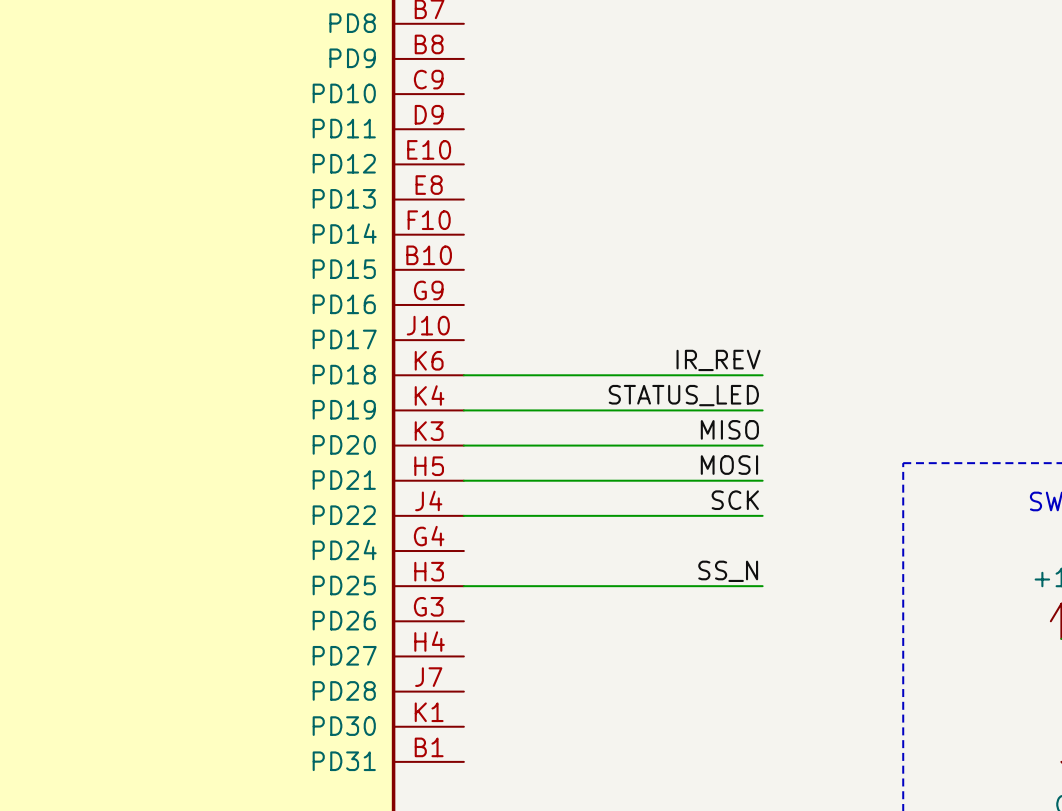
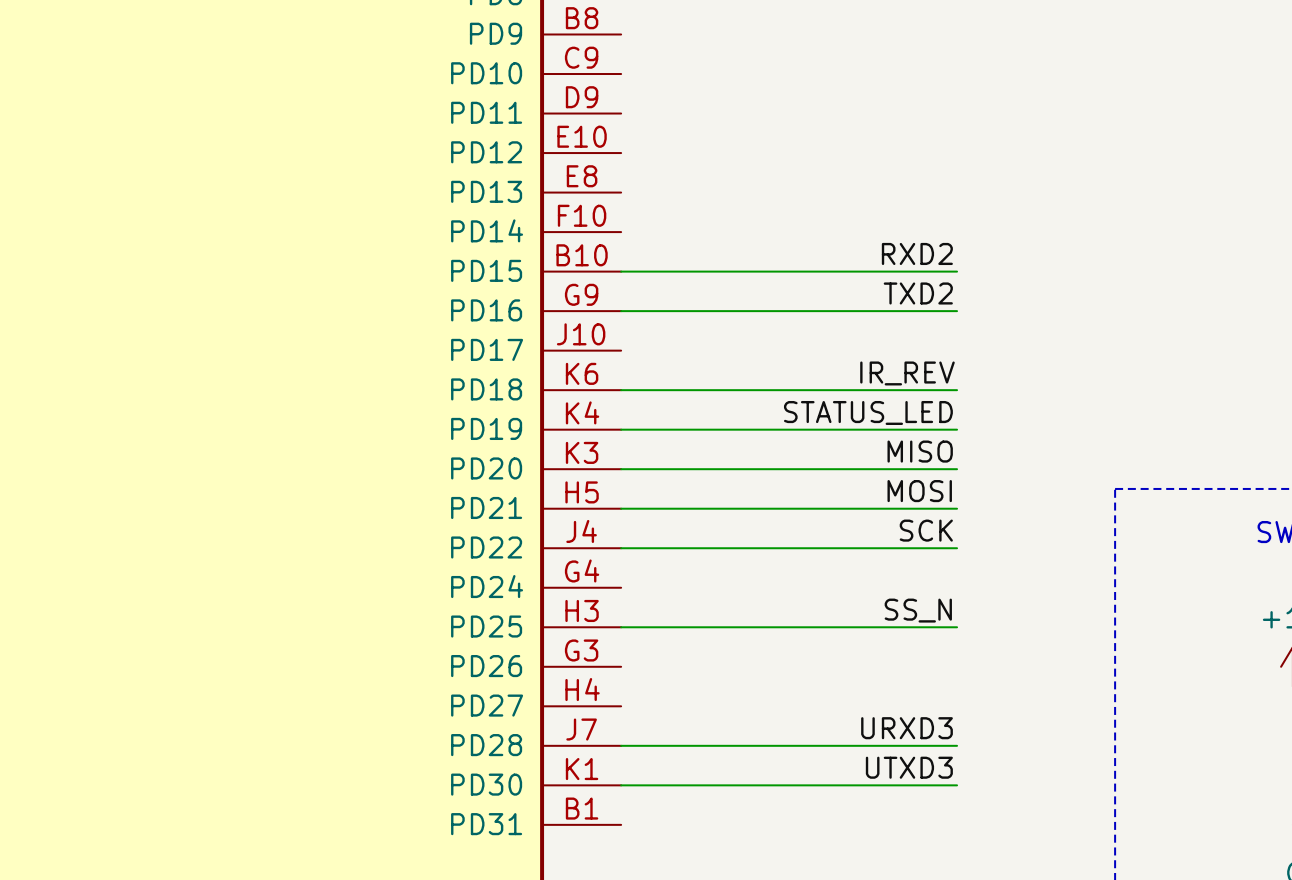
label: none -> RXD2 (917, 253)
wire: none -> (621, 271) (957, 271)
label: none -> TXD2 (918, 293)
wire: none -> (621, 311) (957, 311)
label: none -> URXD3 (907, 728)
wire: none -> (621, 745) (957, 745)
label: none -> UTXD3 (909, 767)
wire: none -> (621, 785) (957, 785)

